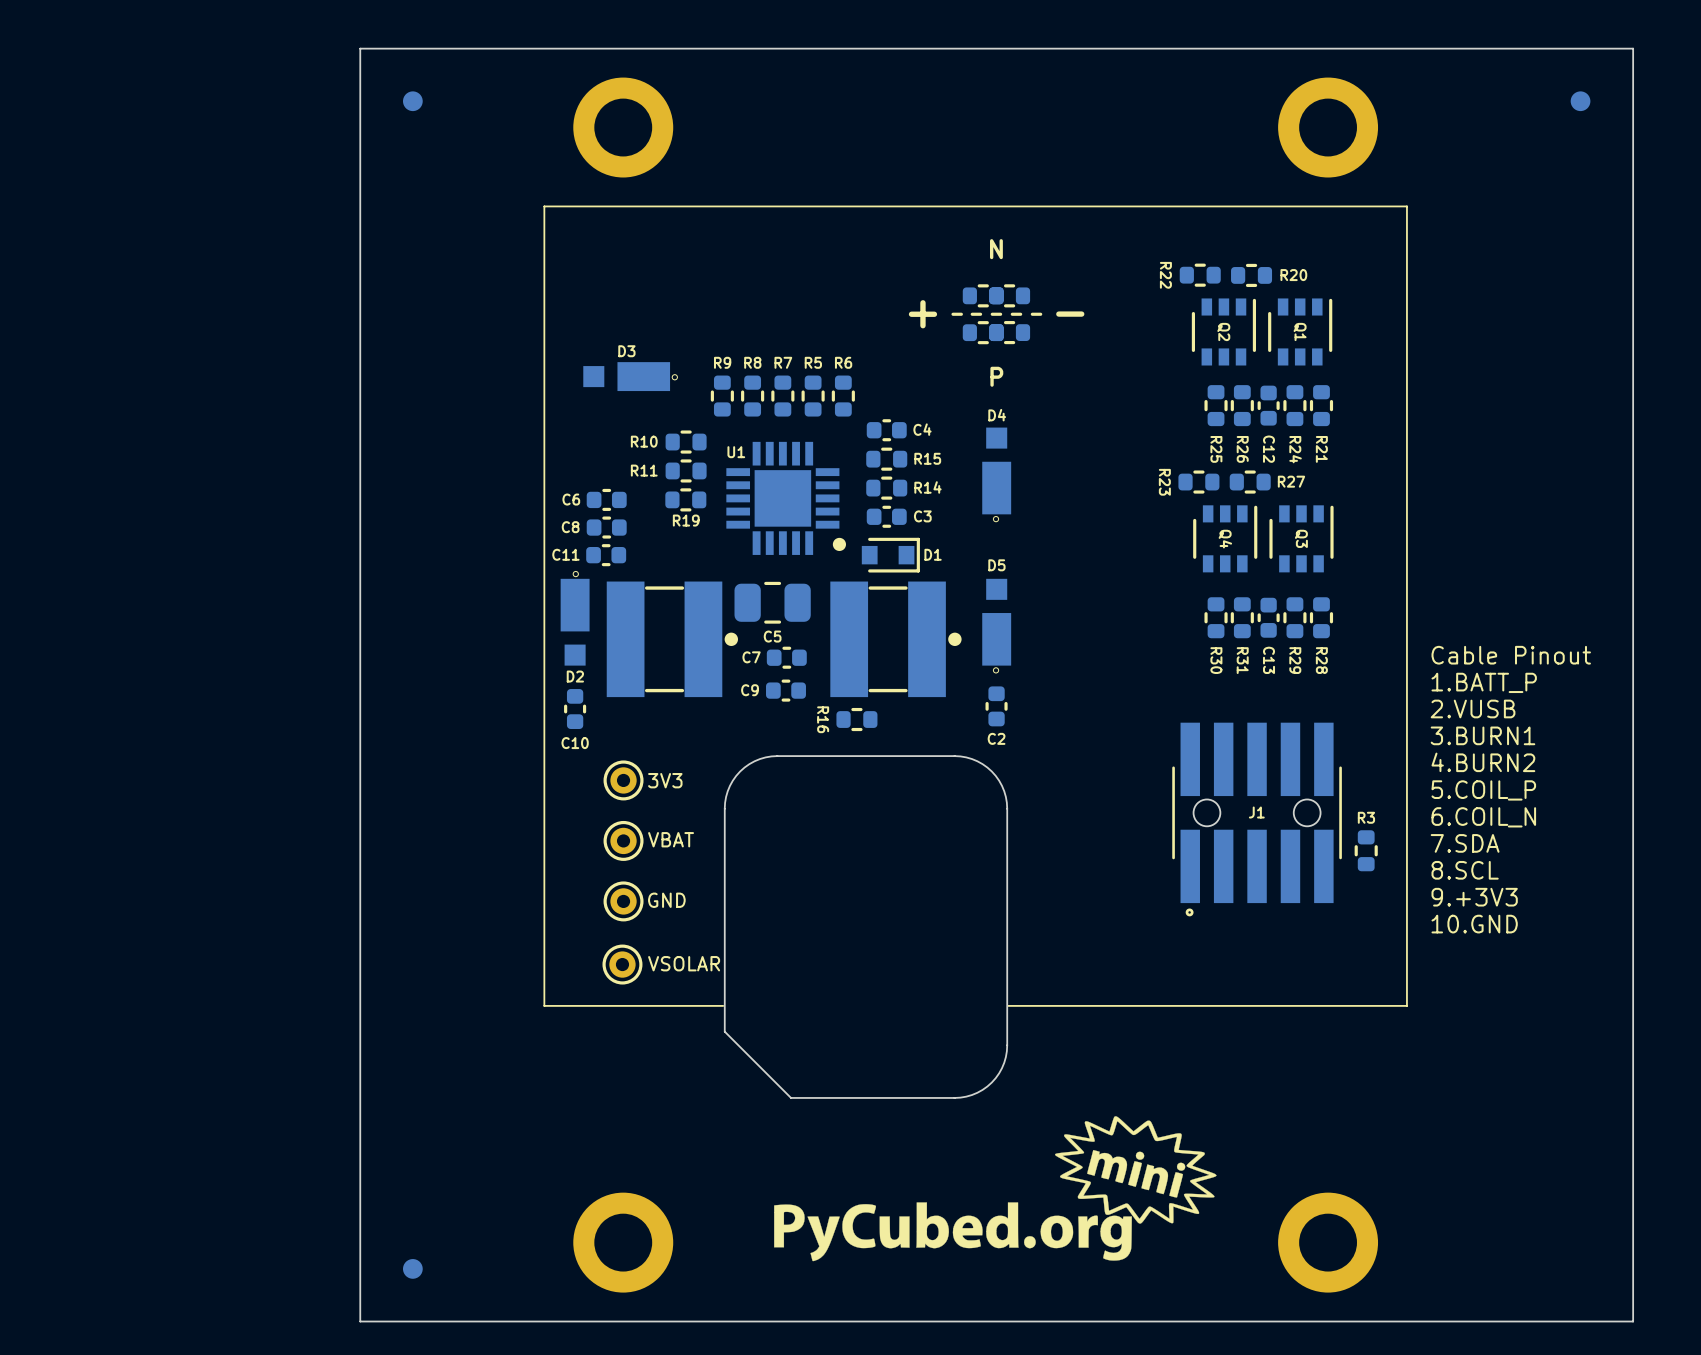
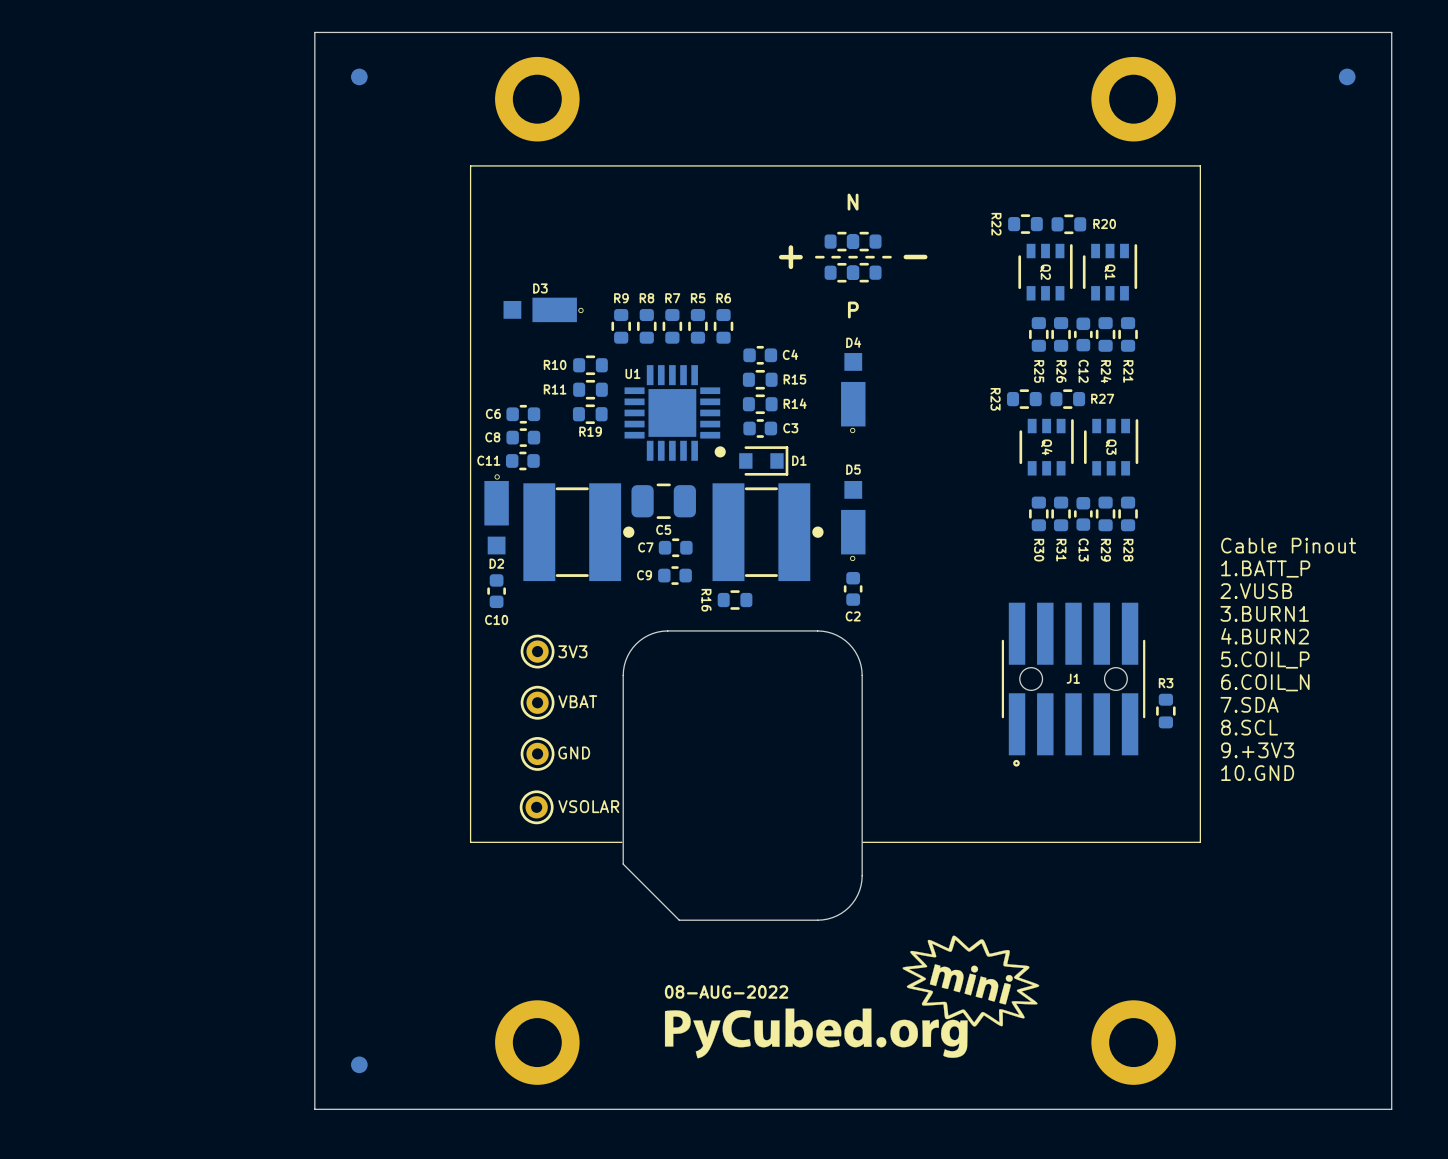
text: none -> 08-AUG-2022 (726, 991)

